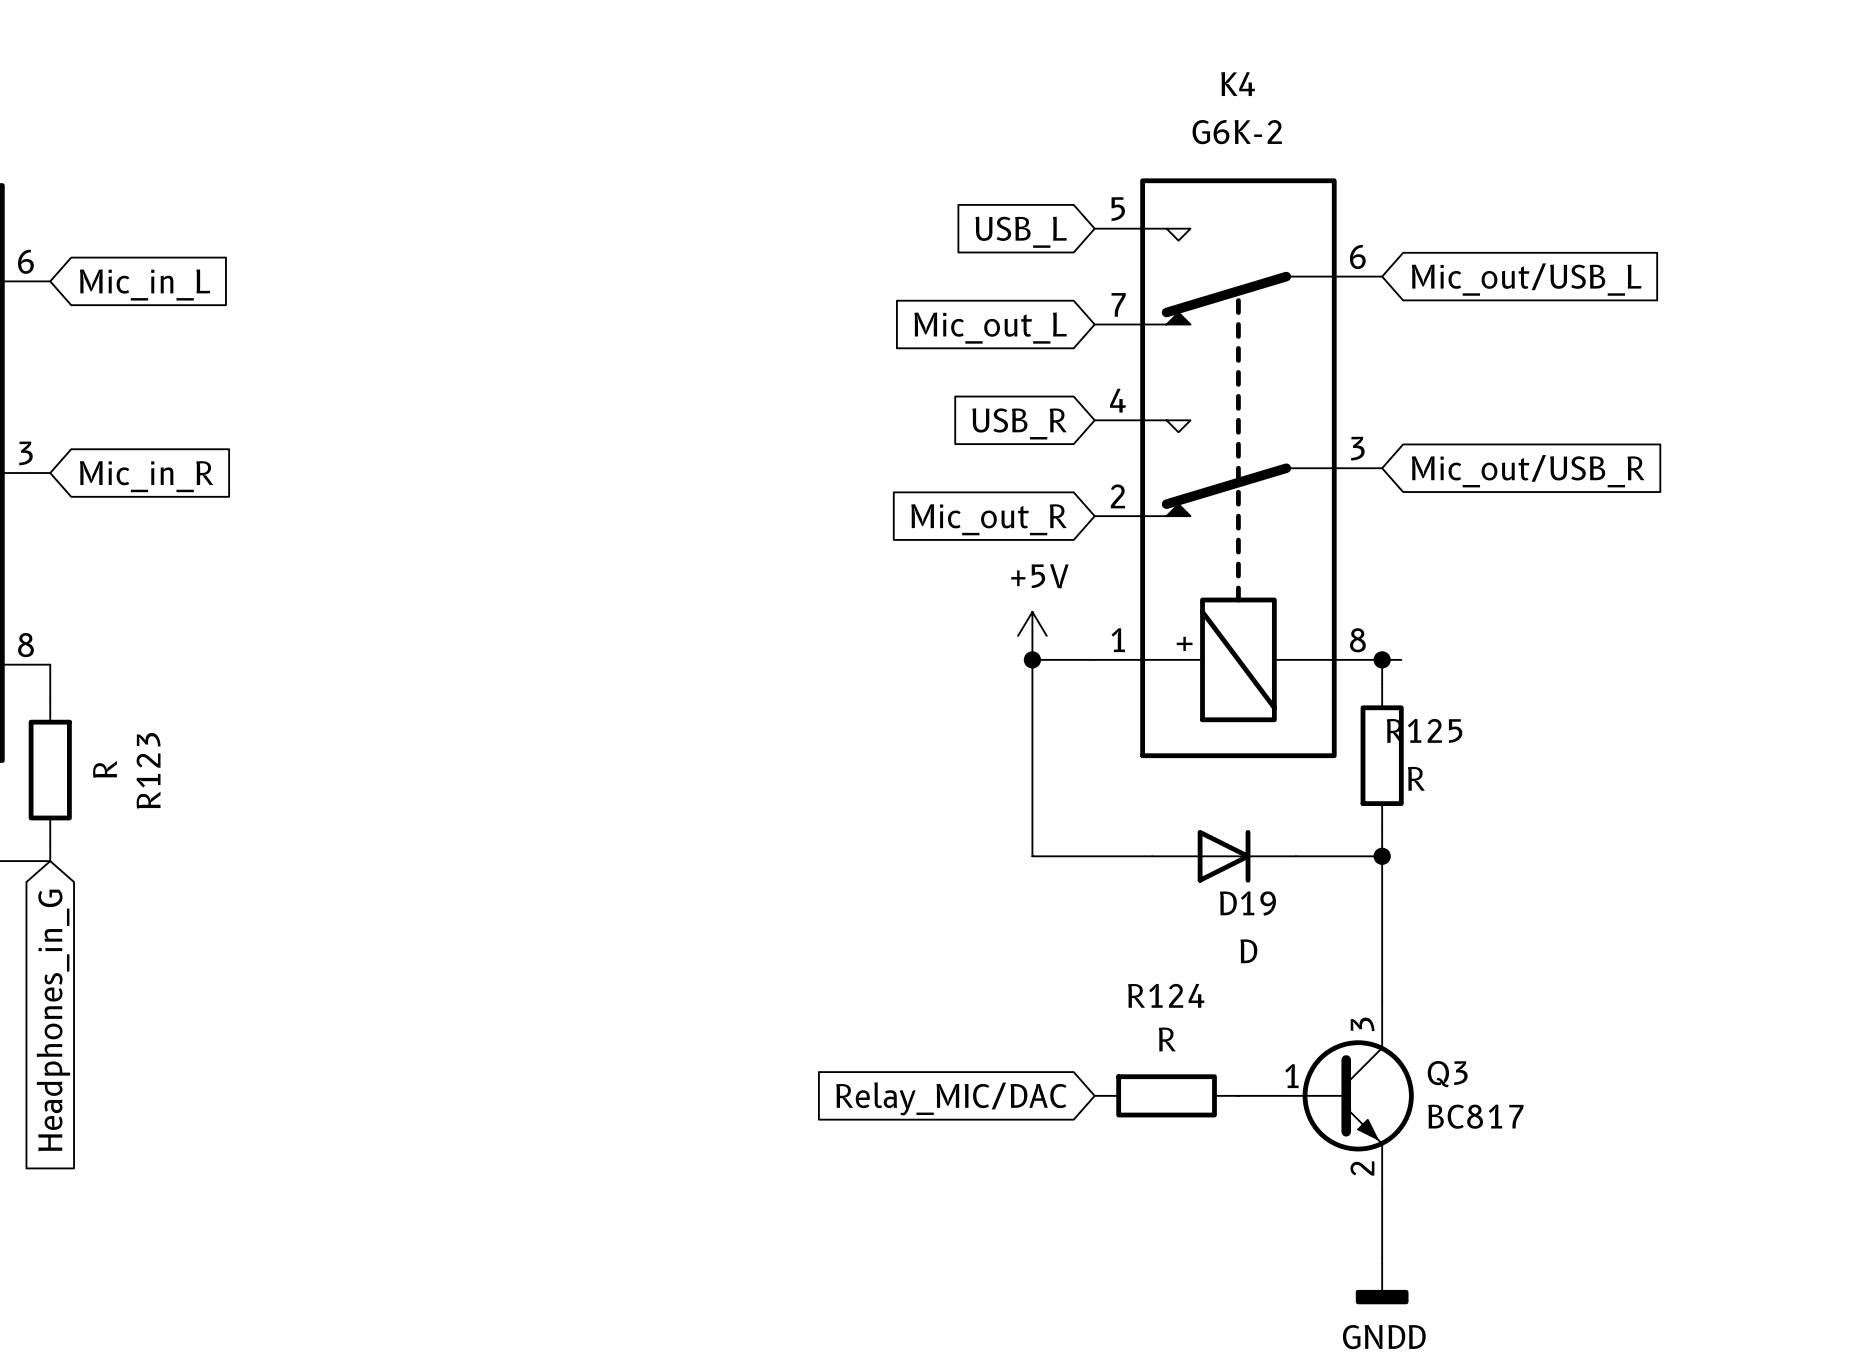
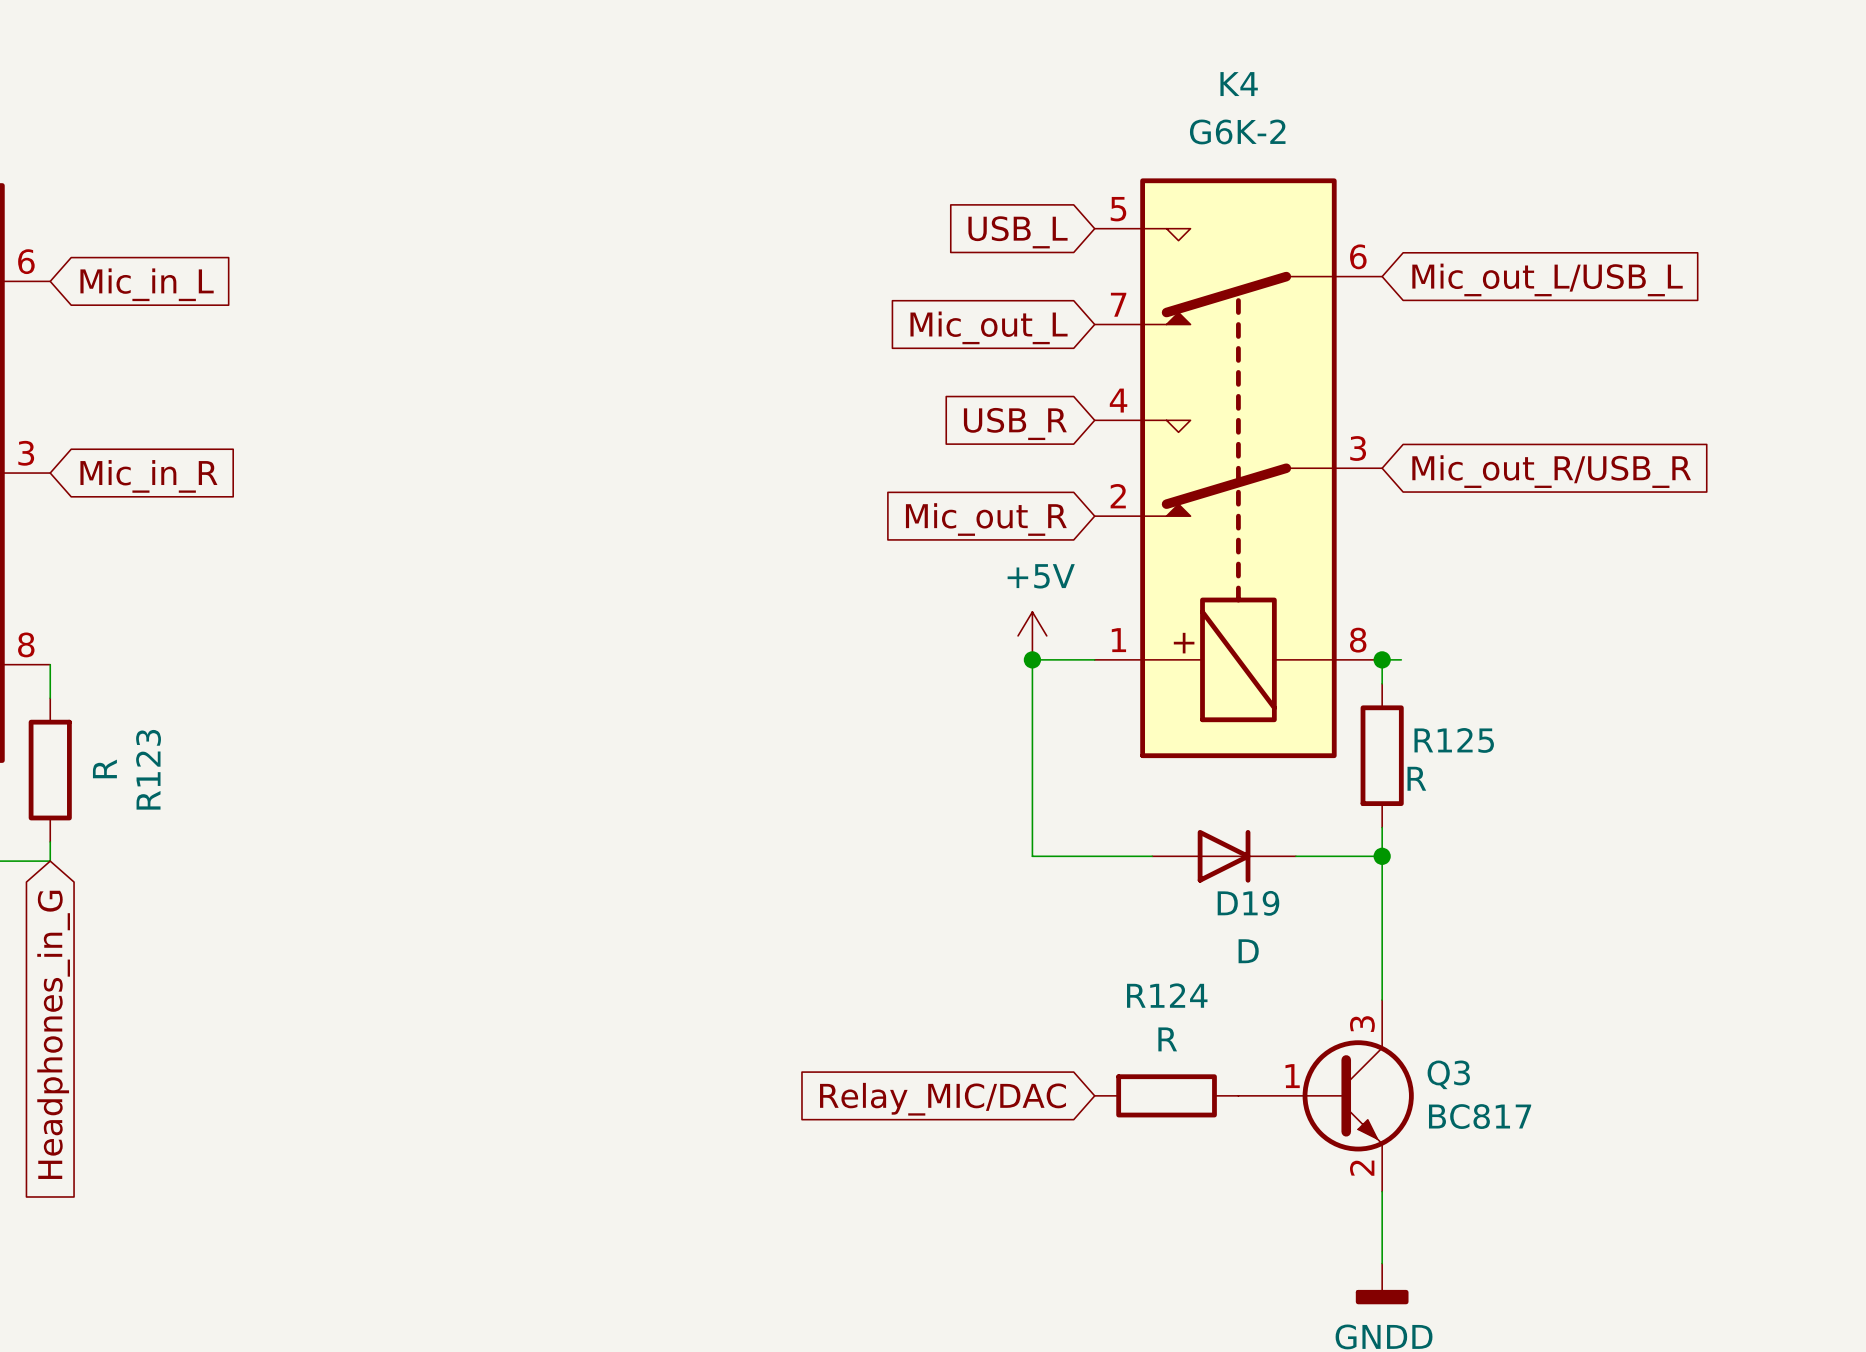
global label: Mic_out/USB_L (1526, 279) -> Mic_out_L/USB_L (1547, 279)
global label: Mic_out/USB_R (1528, 471) -> Mic_out_R/USB_R (1551, 471)
R125 name position: R125 (1424, 730) -> R125 (1454, 740)

